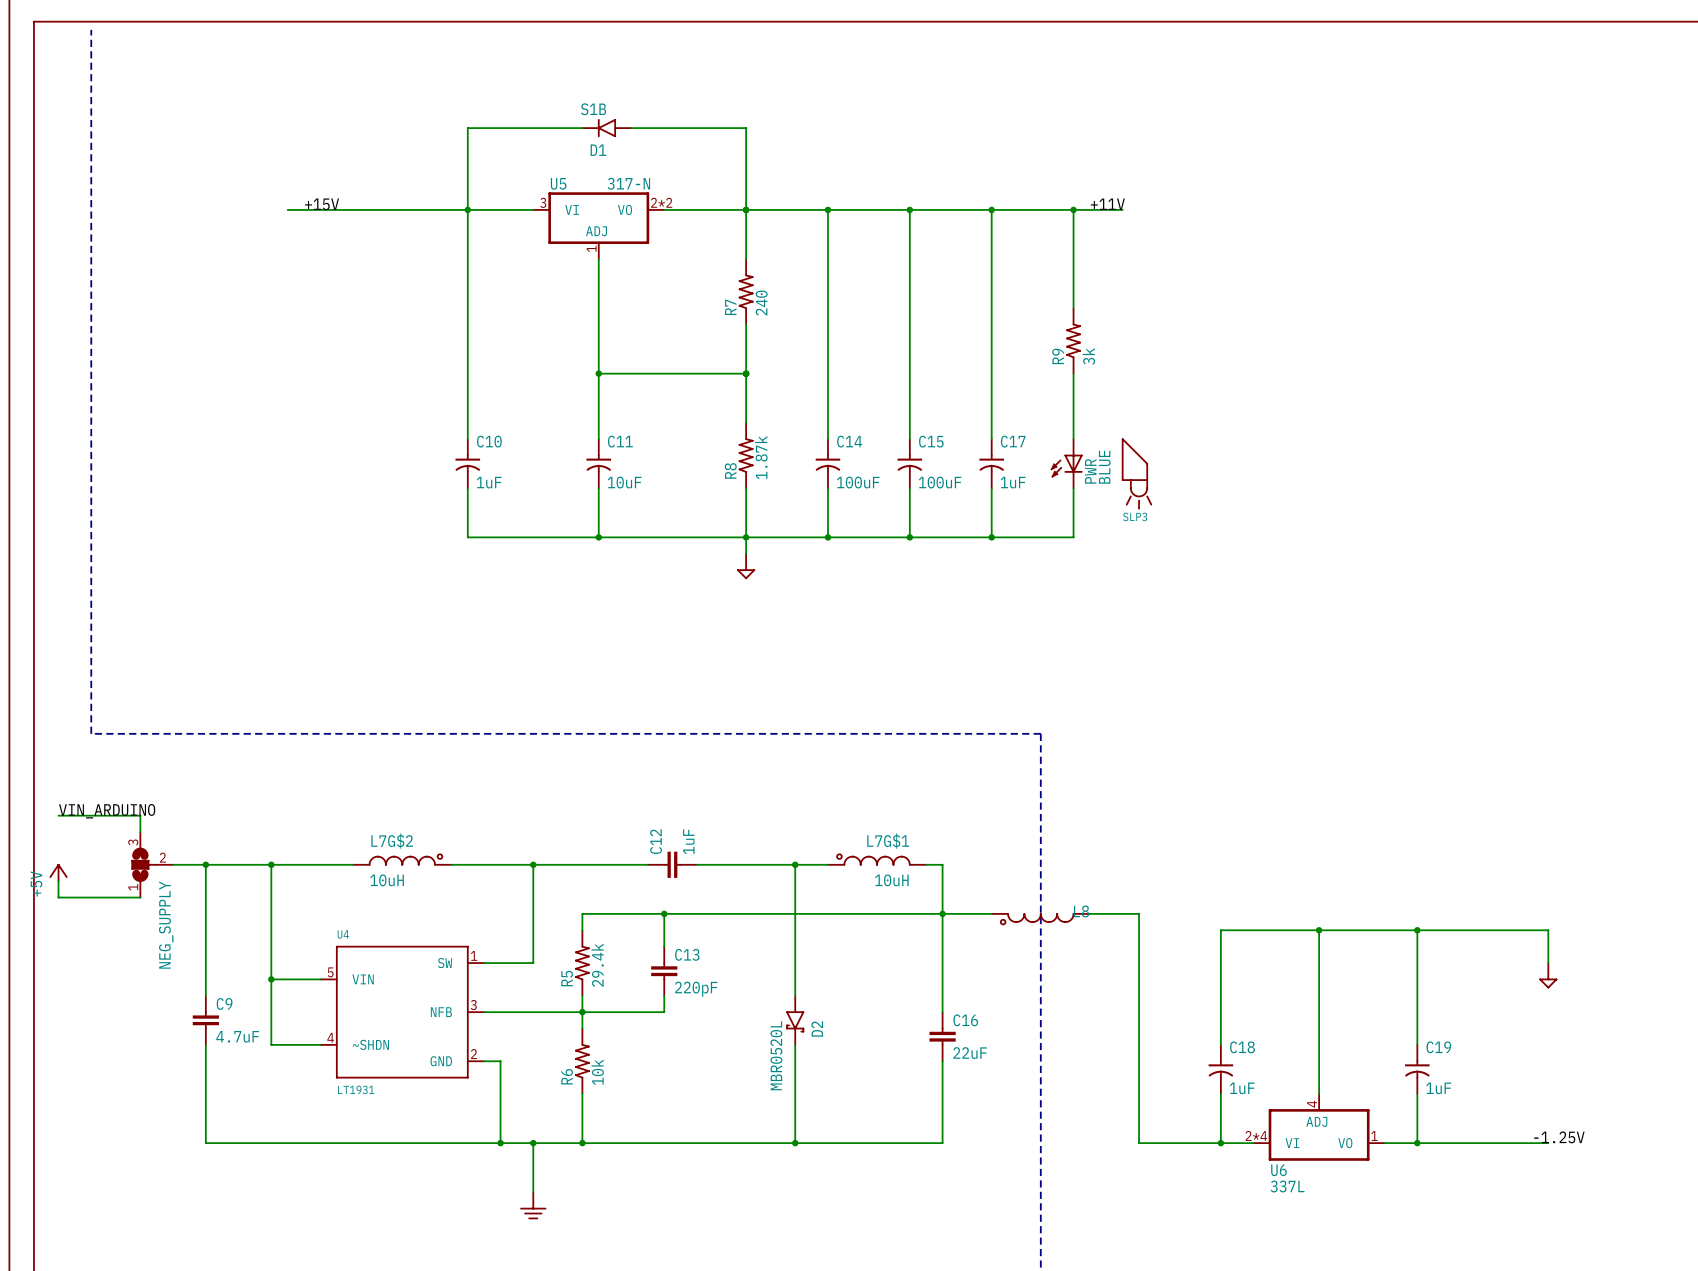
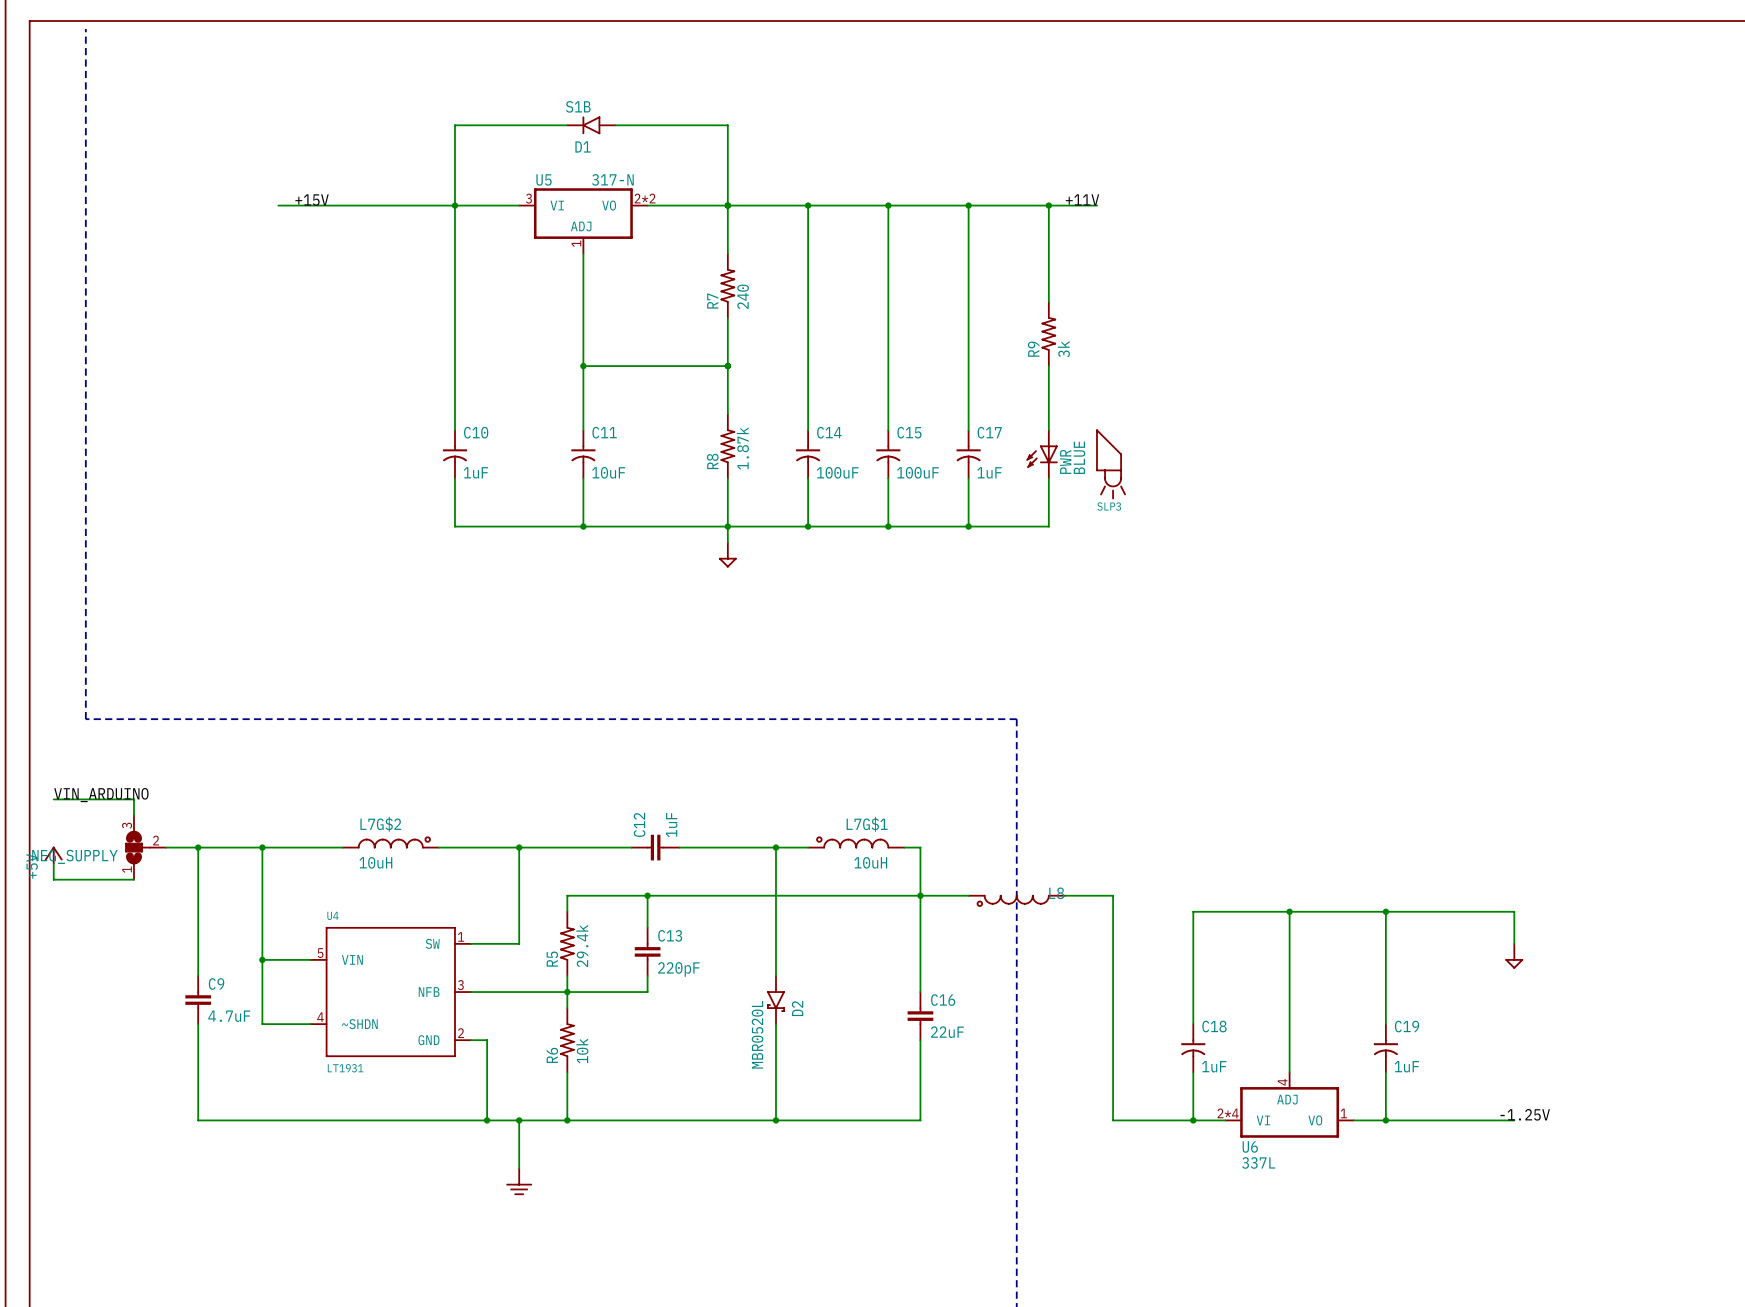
NEG_SUPPLY name rotation: 0° (166, 925) -> 90° clockwise (74, 856)
NEG_SUPPLY name position: NEG_SUPPLY (166, 925) -> NEG_SUPPLY (74, 856)

